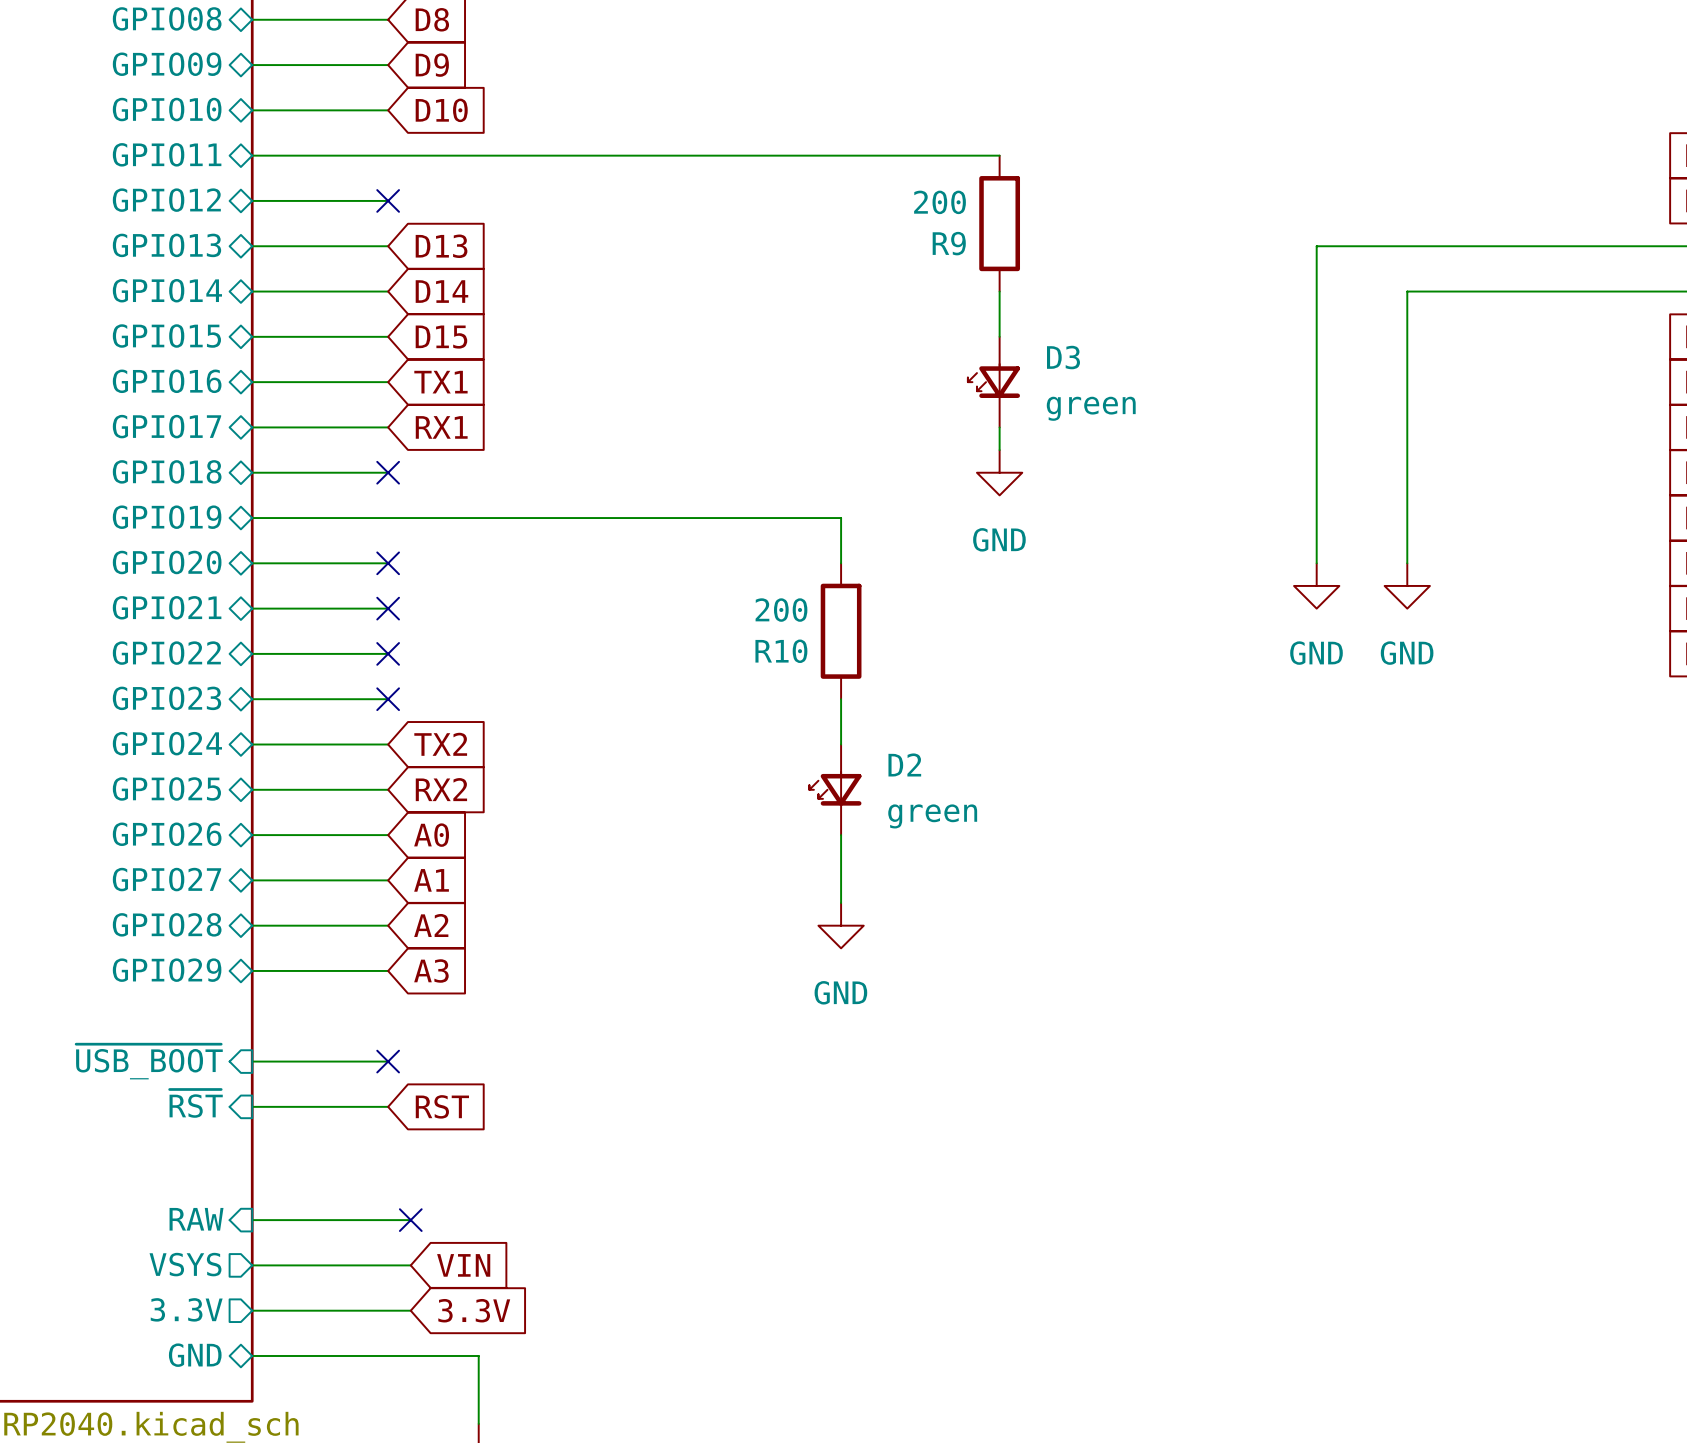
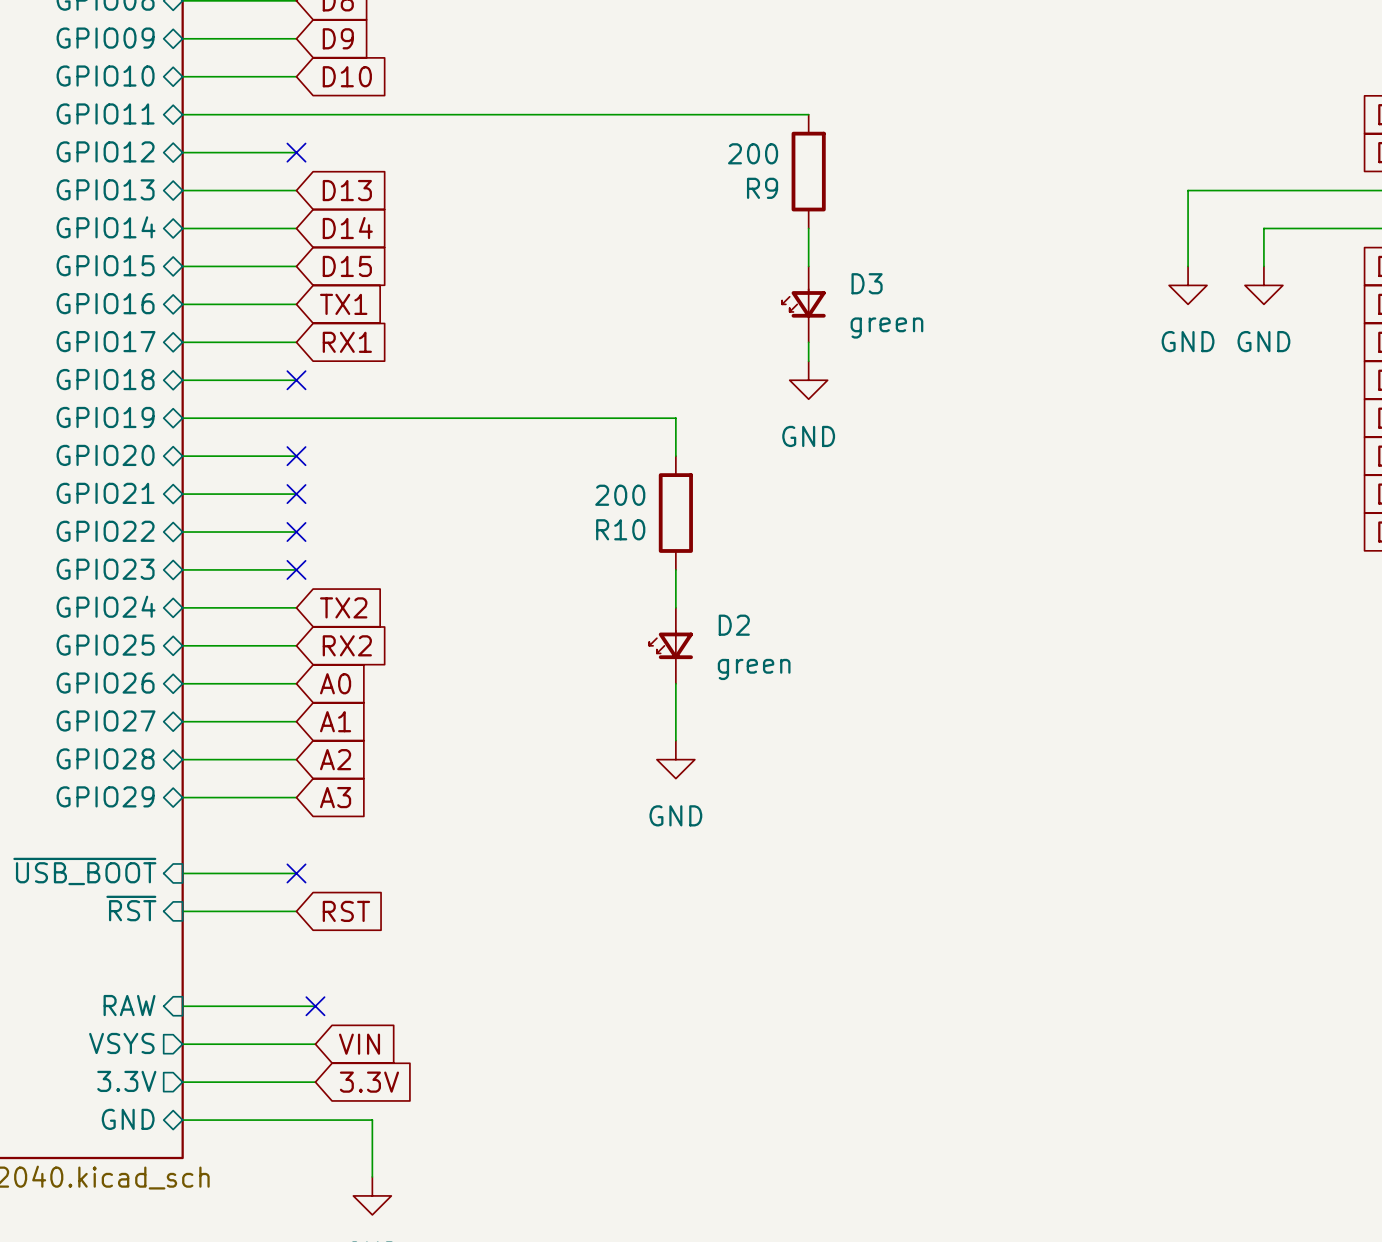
wire: (1452, 246) (1316, 246) (1316, 563) -> (1188, 190) (1188, 266)
wire: (1543, 291) (1407, 291) (1407, 563) -> (1263, 228) (1263, 266)
power symbol: none -> GND (1188, 285)
power symbol: none -> GND (1263, 285)
power symbol: GND (1316, 585) -> none
power symbol: GND (1407, 585) -> none

